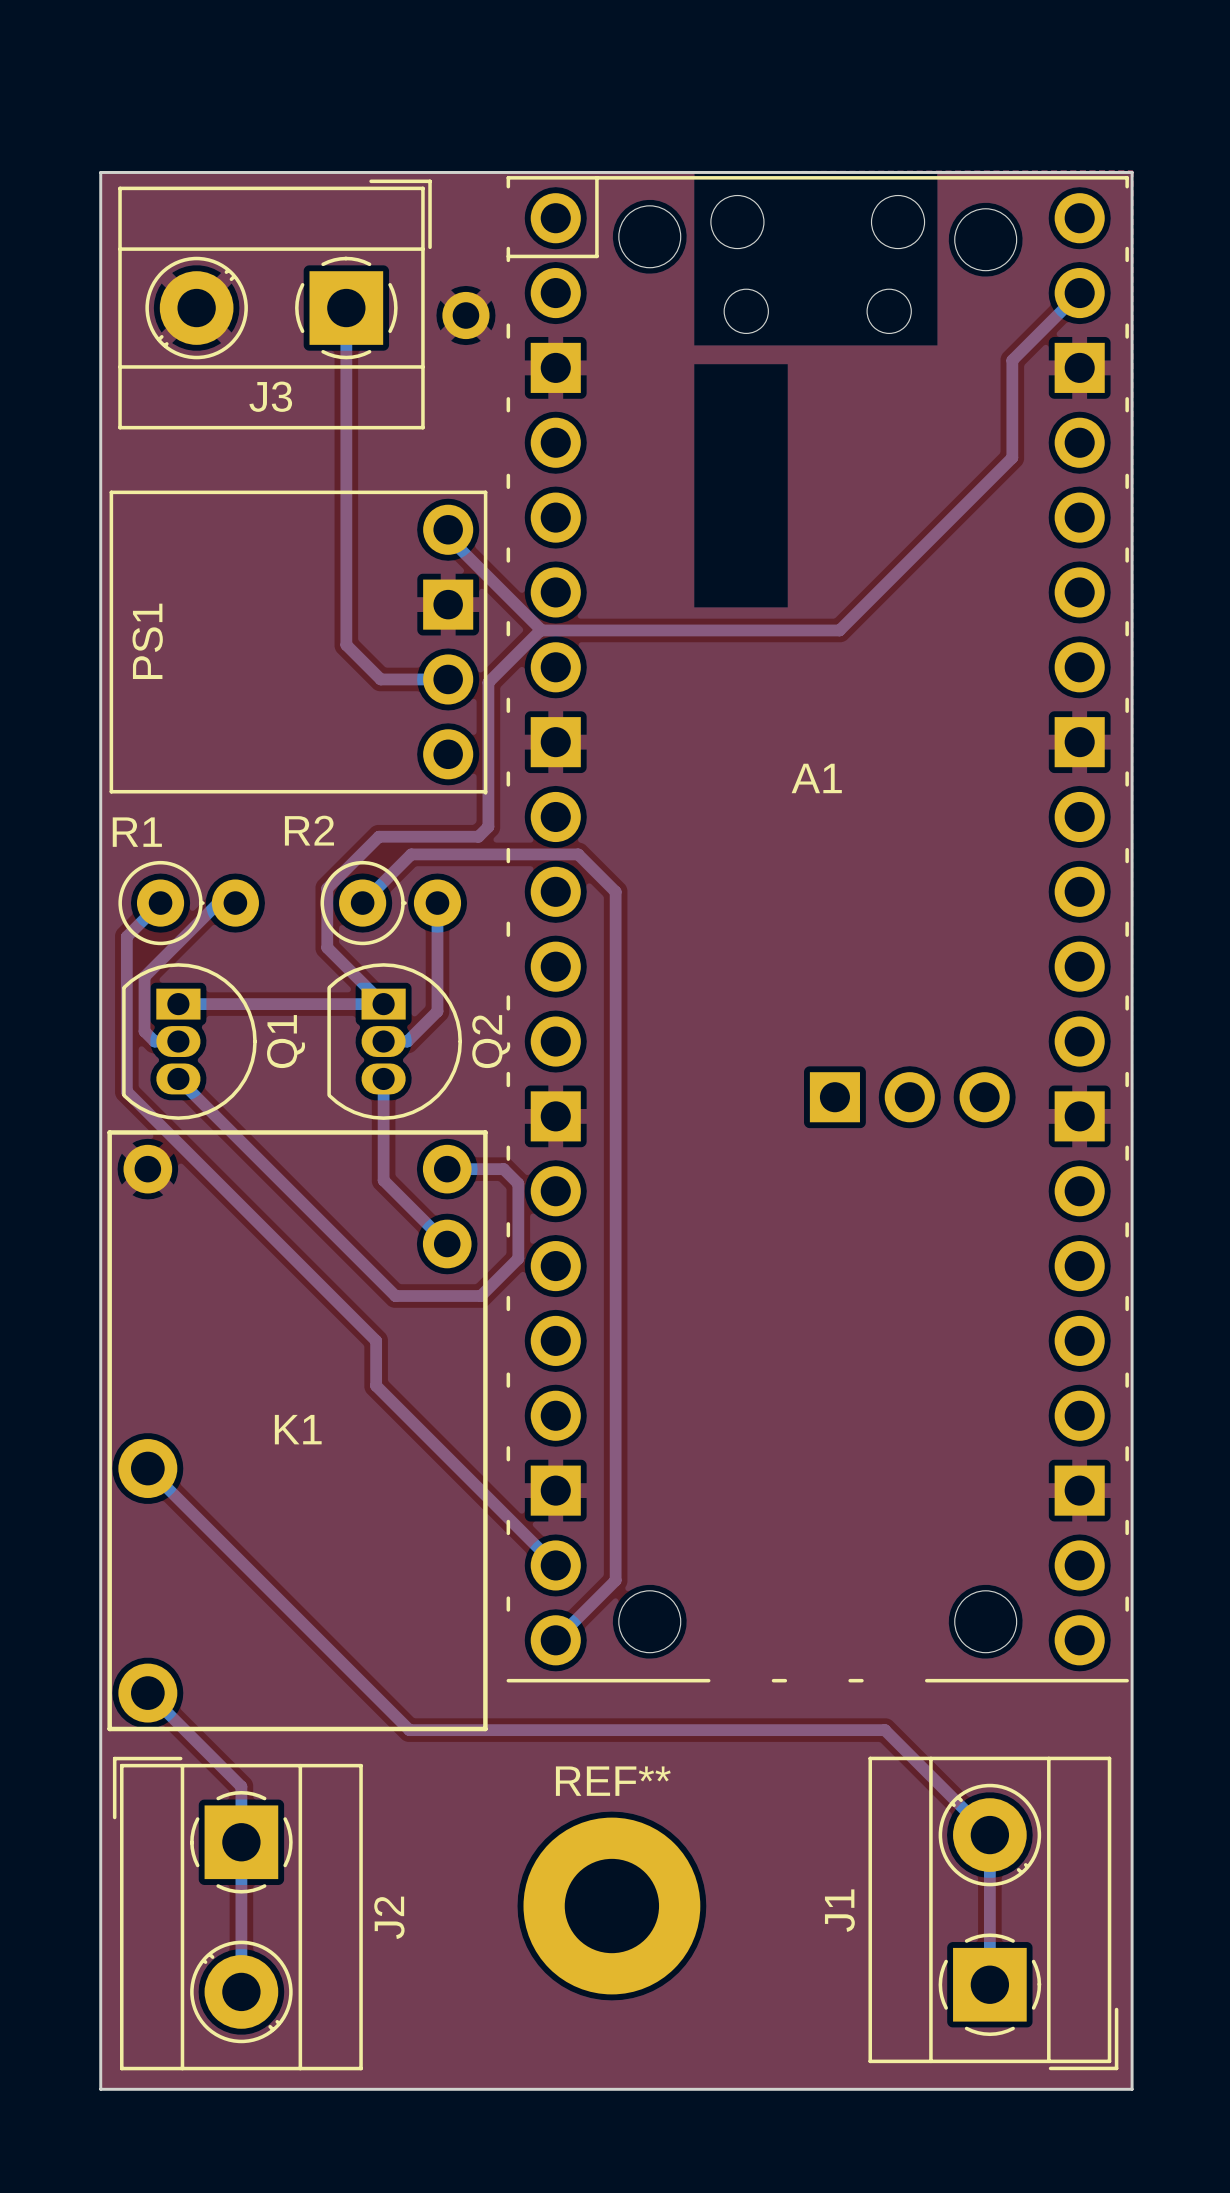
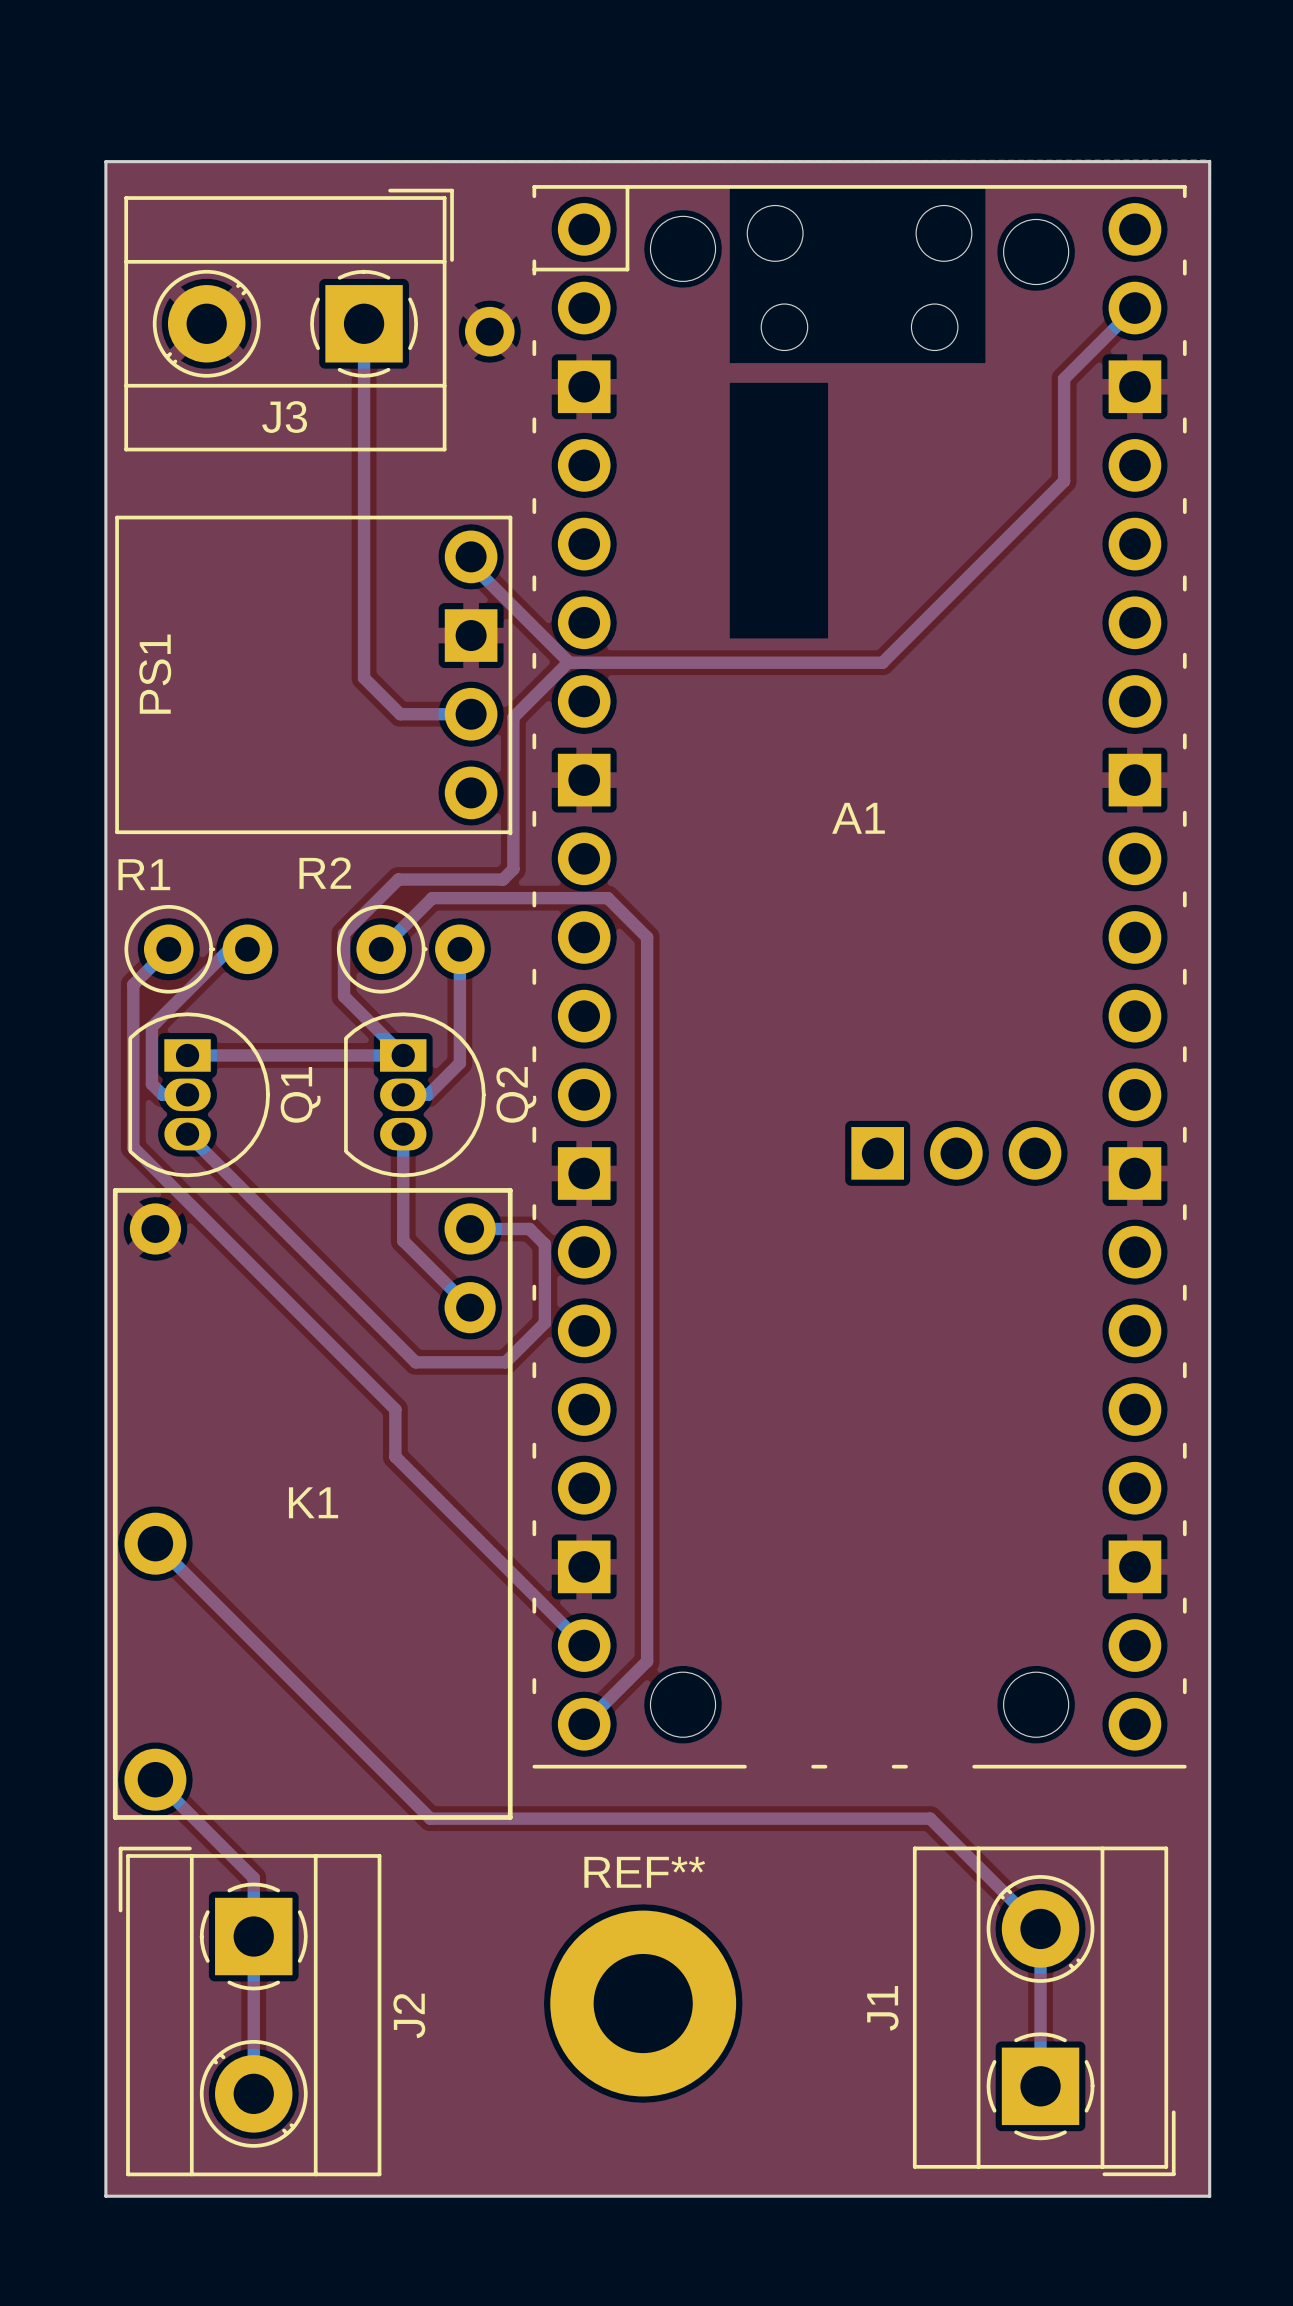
board edge: (100, 172) (1132, 172) (1132, 2089) -> (105, 181) (105, 161) (1209, 161) (1209, 2196) (1190, 2196)

